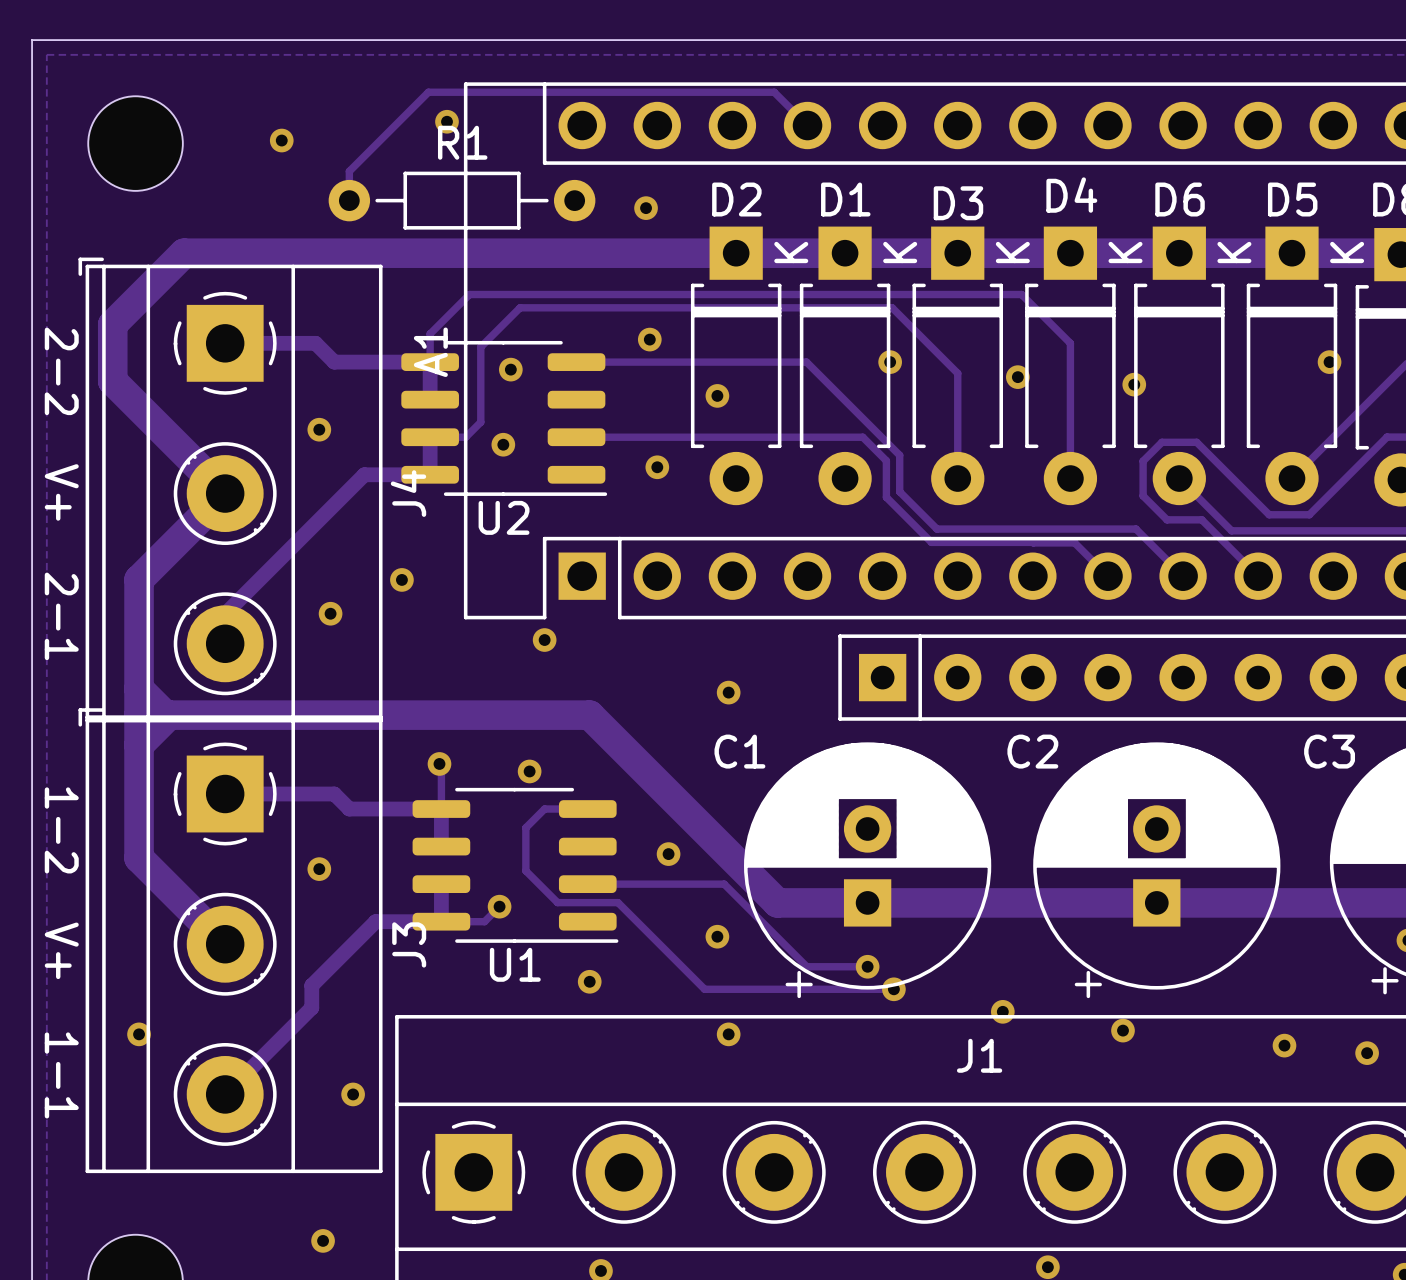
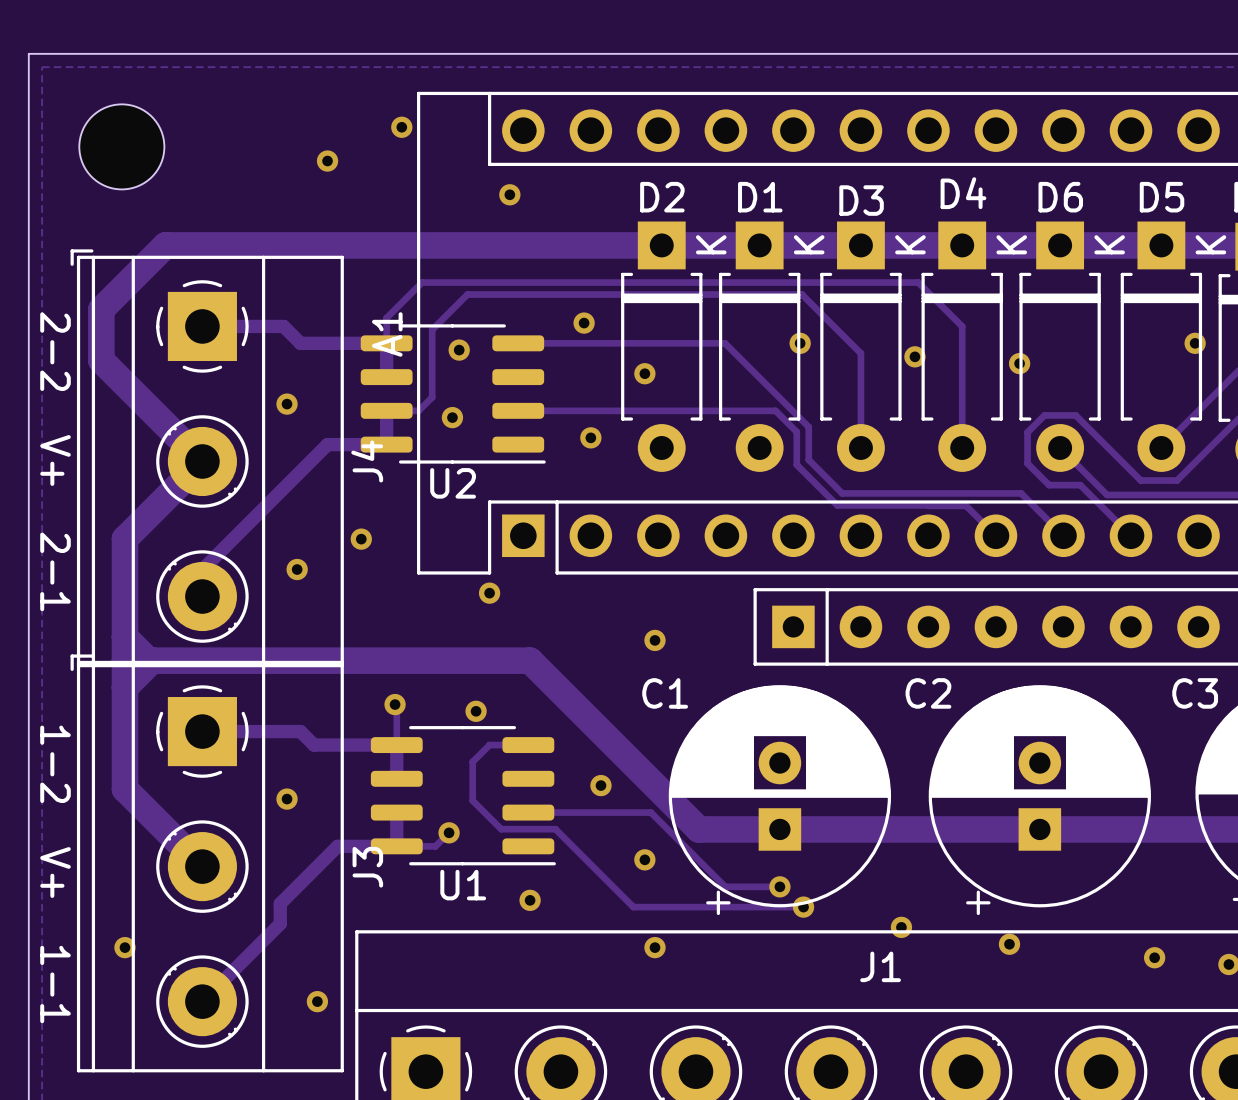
track: (807, 125) (774, 92) (428, 92) (349, 171) (349, 200) -> none
via position: (281, 140) -> (327, 161)
R1: (462, 200) -> none
via position: (646, 208) -> (509, 194)

